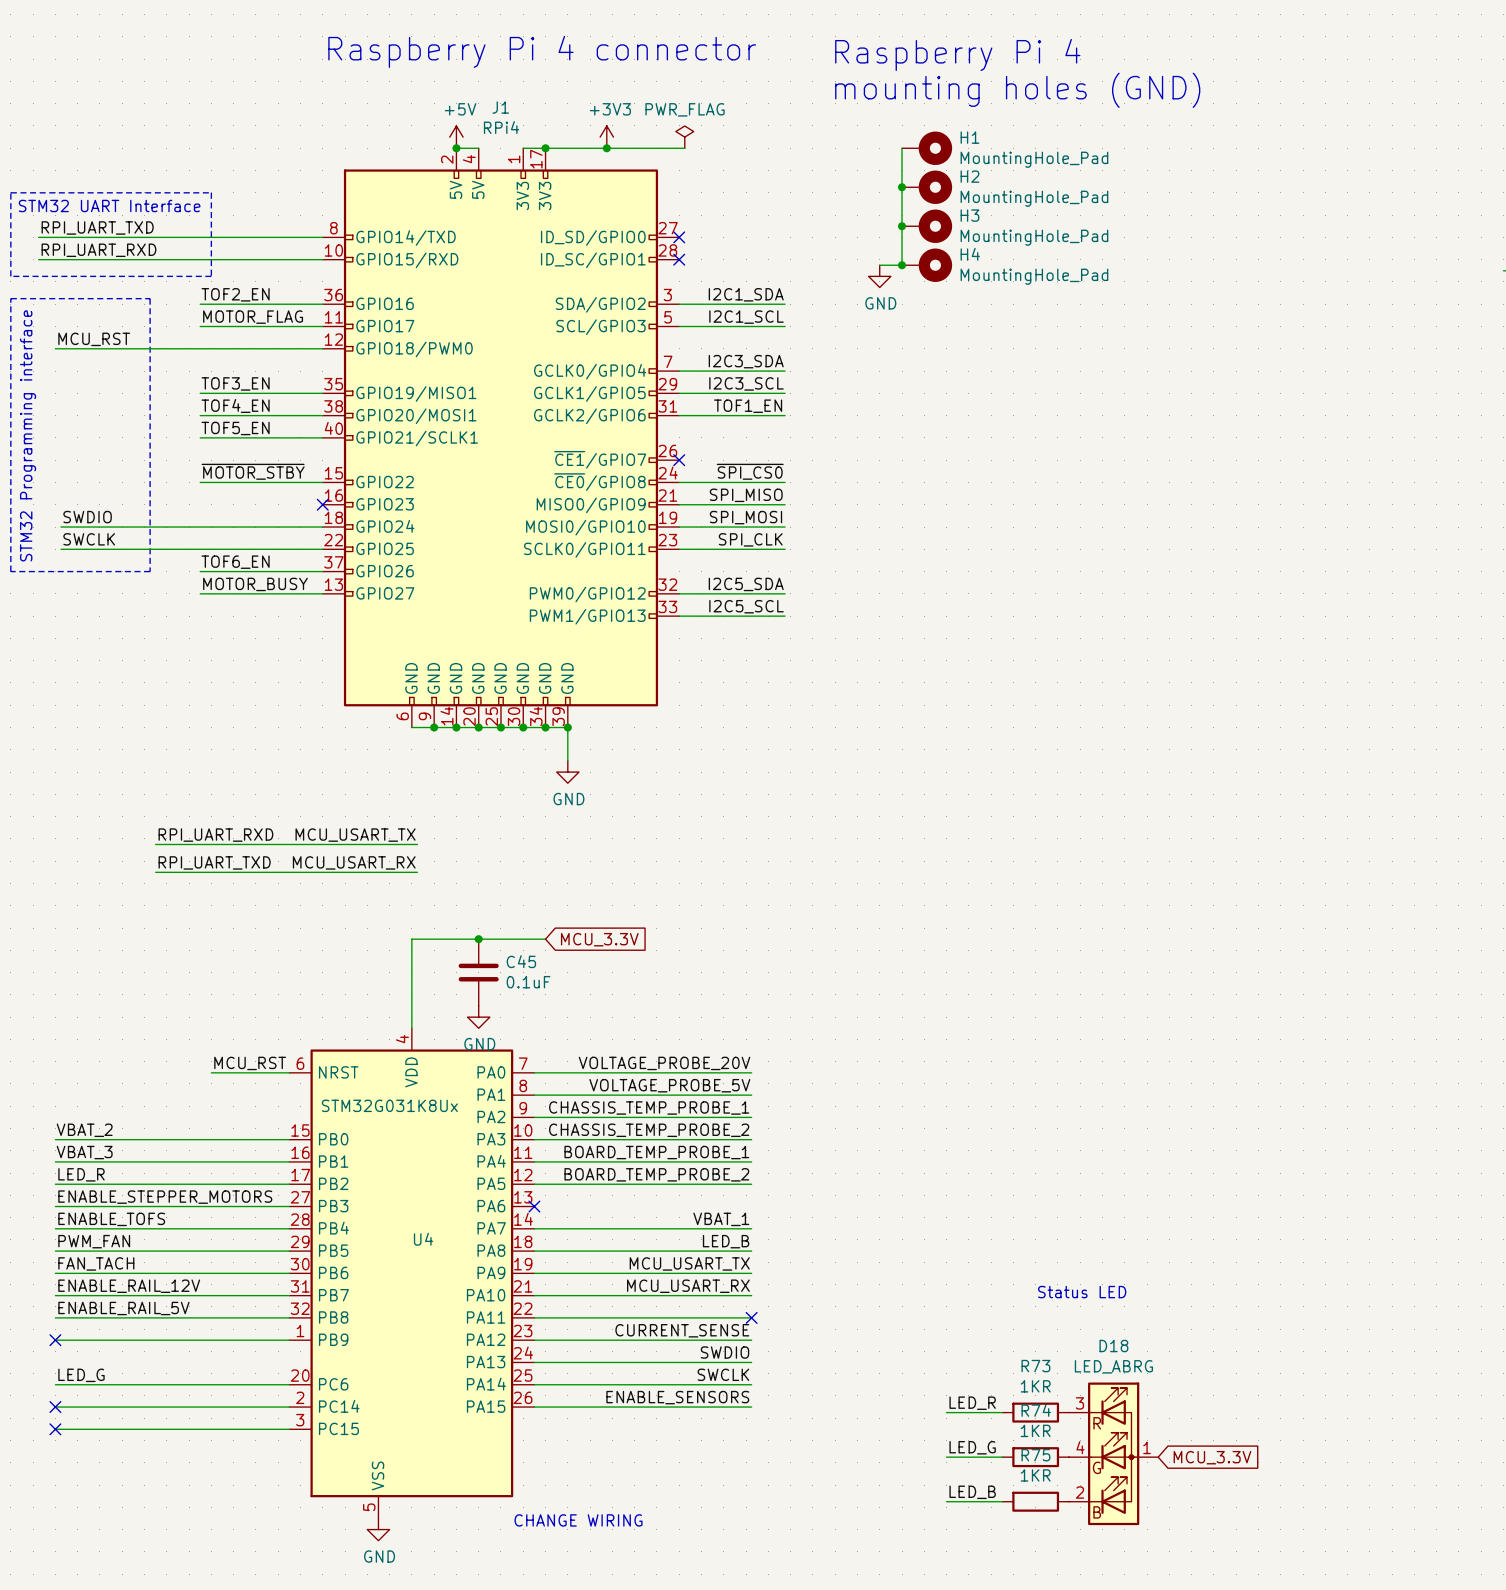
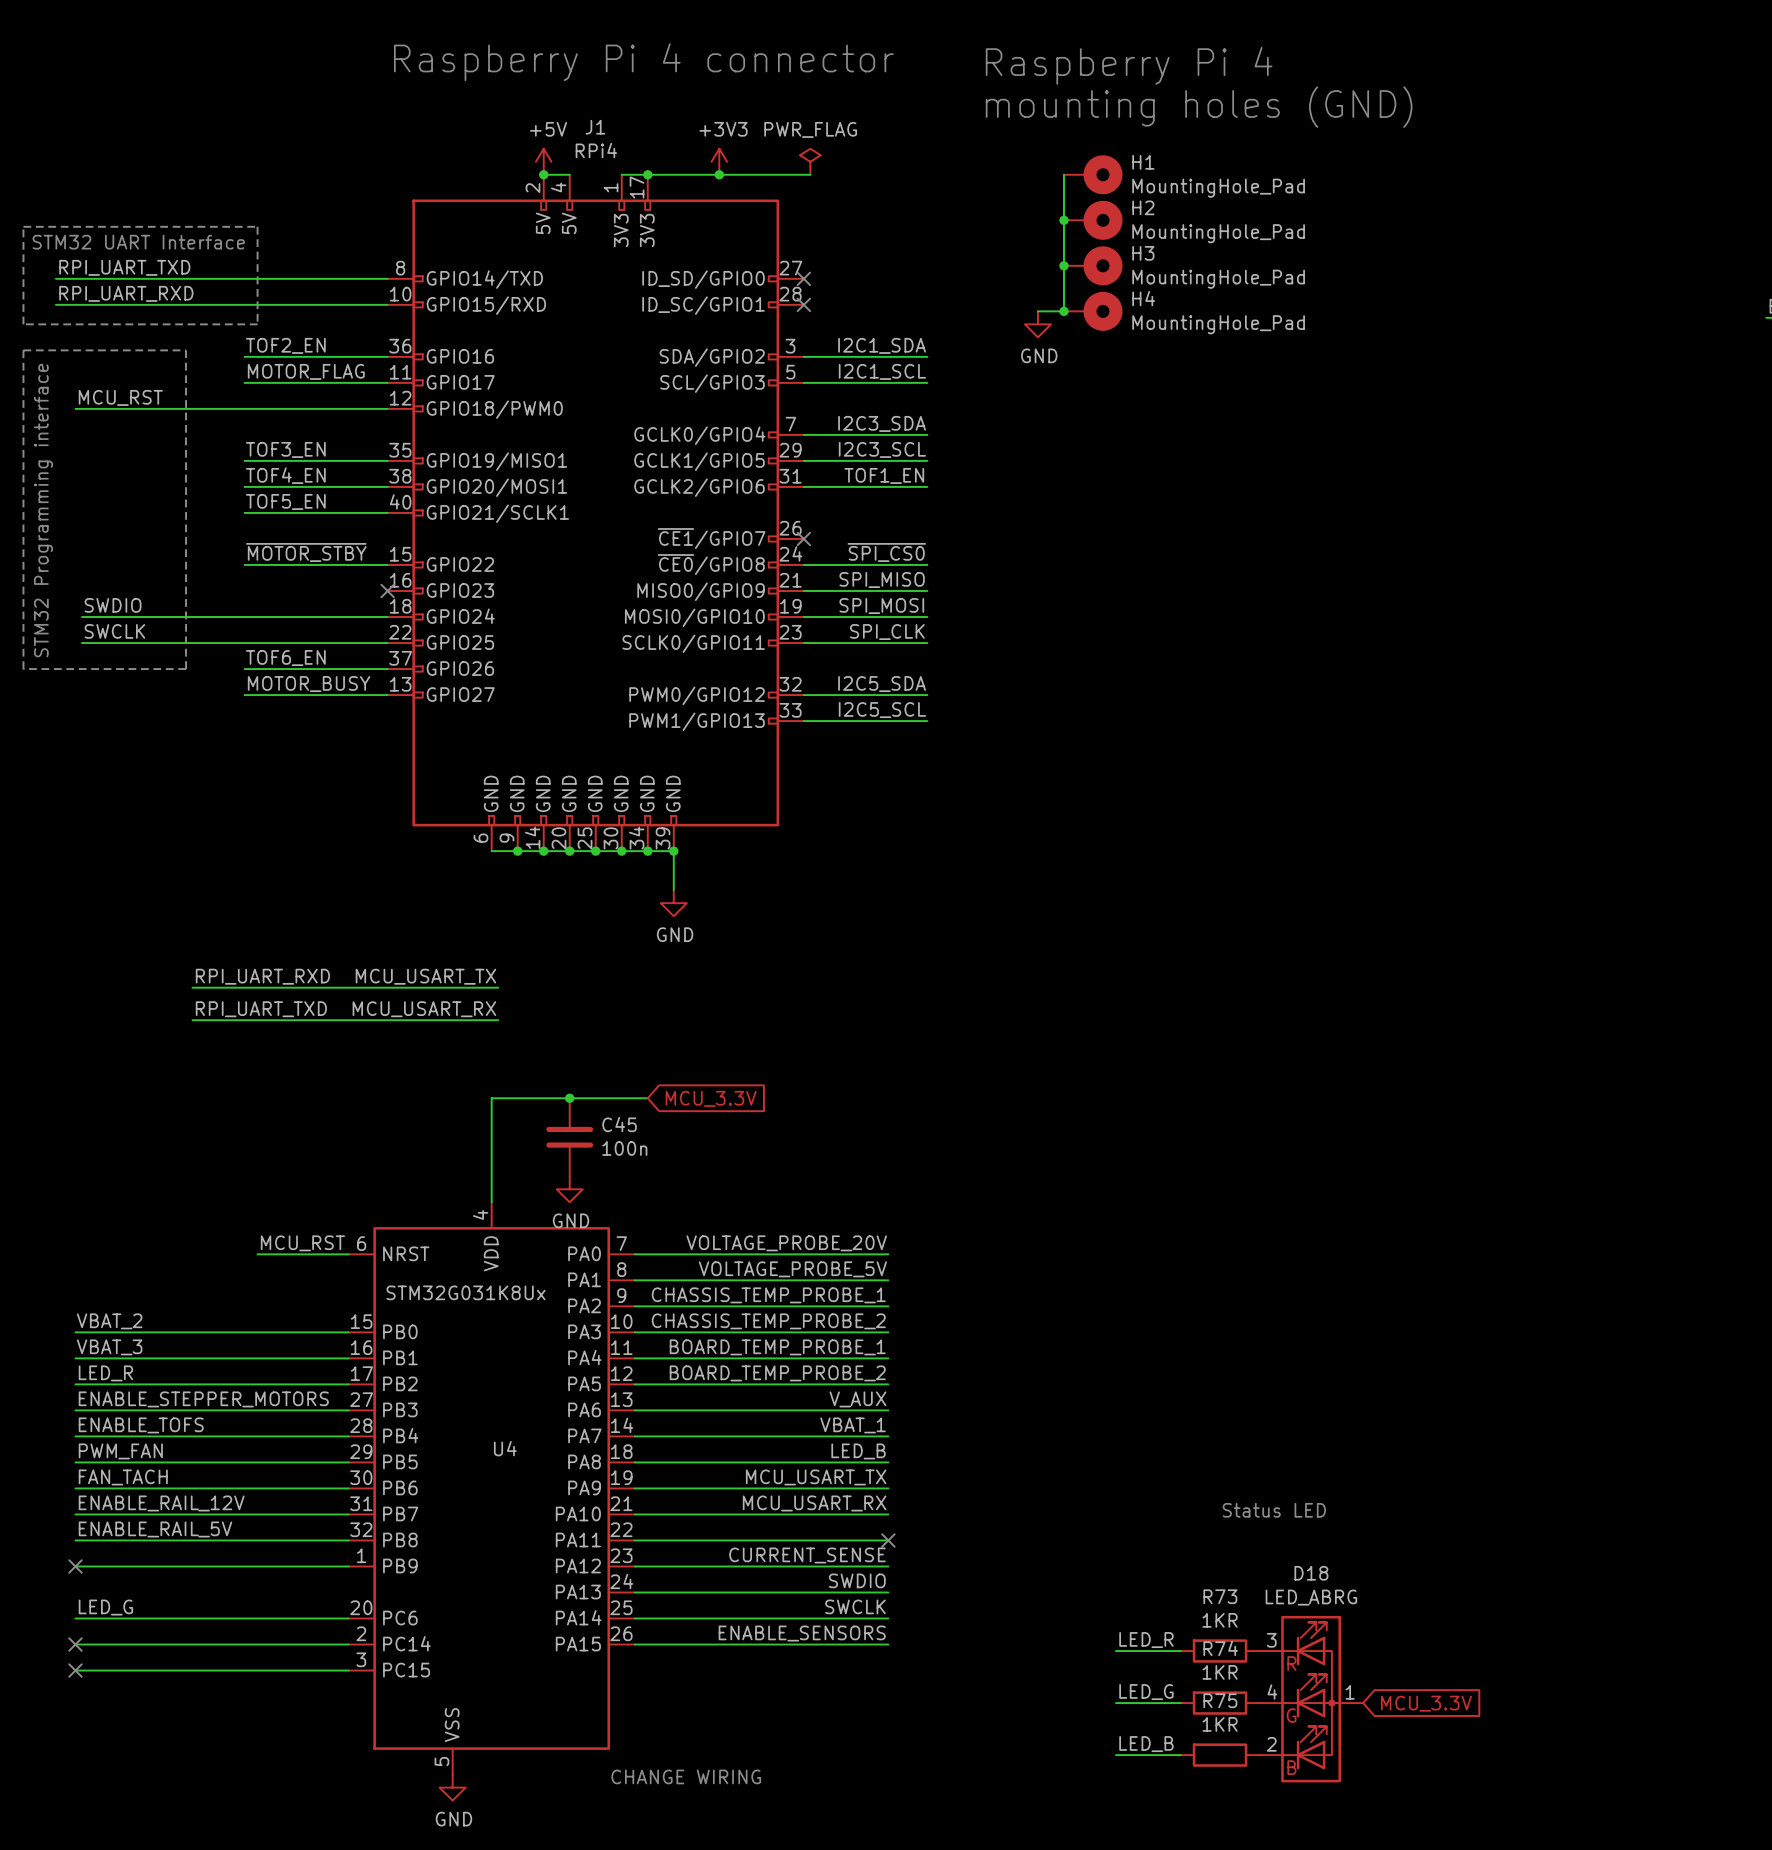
C45 value: 0.1uF (528, 982) -> 100n (624, 1148)
label: none -> V_AUX (857, 1399)
wire: none -> (634, 1410) (888, 1410)
no-connect mark: (534, 1206) -> none

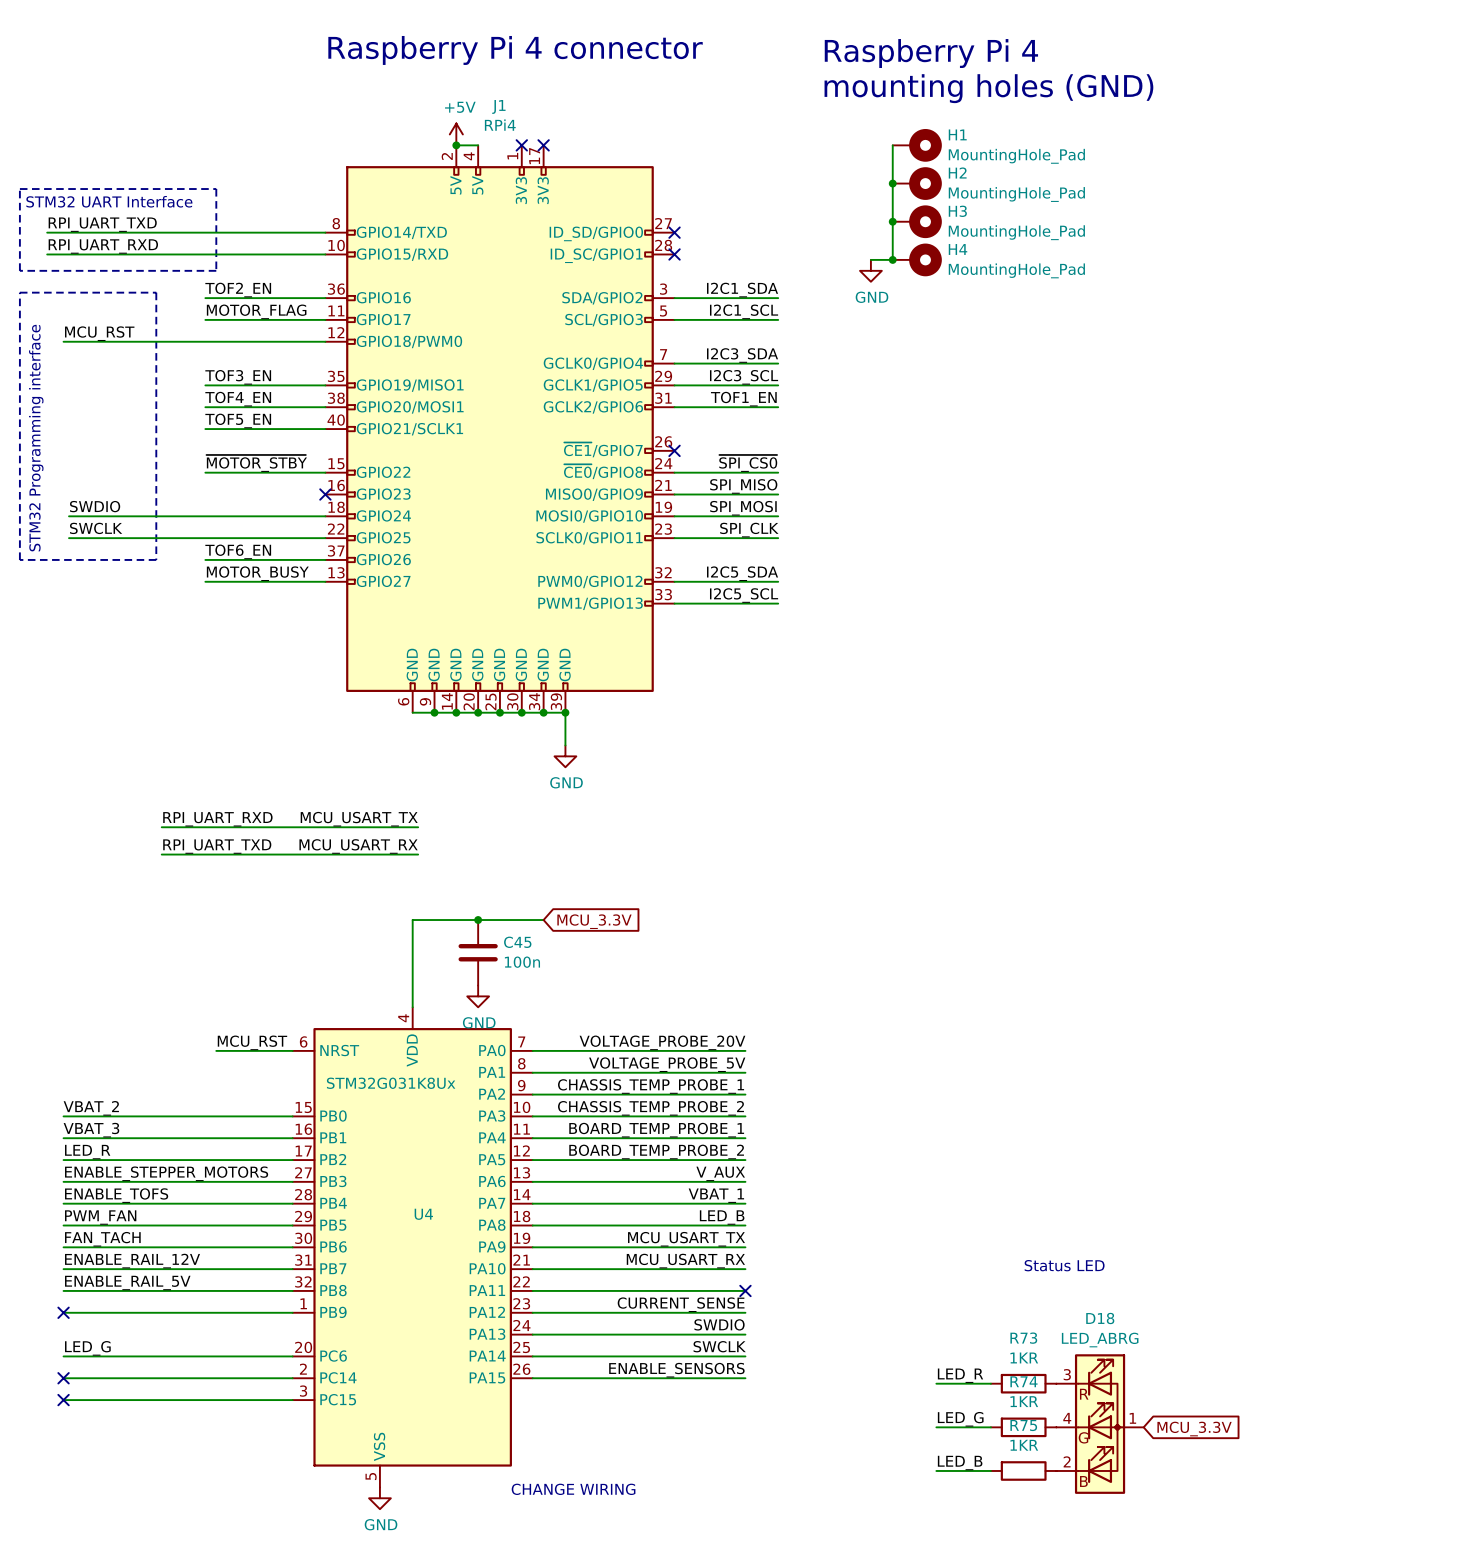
power symbol: +3V3 (719, 161) -> none
power symbol: PWR_FLAG (810, 161) -> none
wire: (621, 174) (810, 174) -> none
no-connect mark: none -> (521, 145)
junction: (647, 174) -> none
no-connect mark: none -> (543, 145)
junction: (719, 174) -> none

